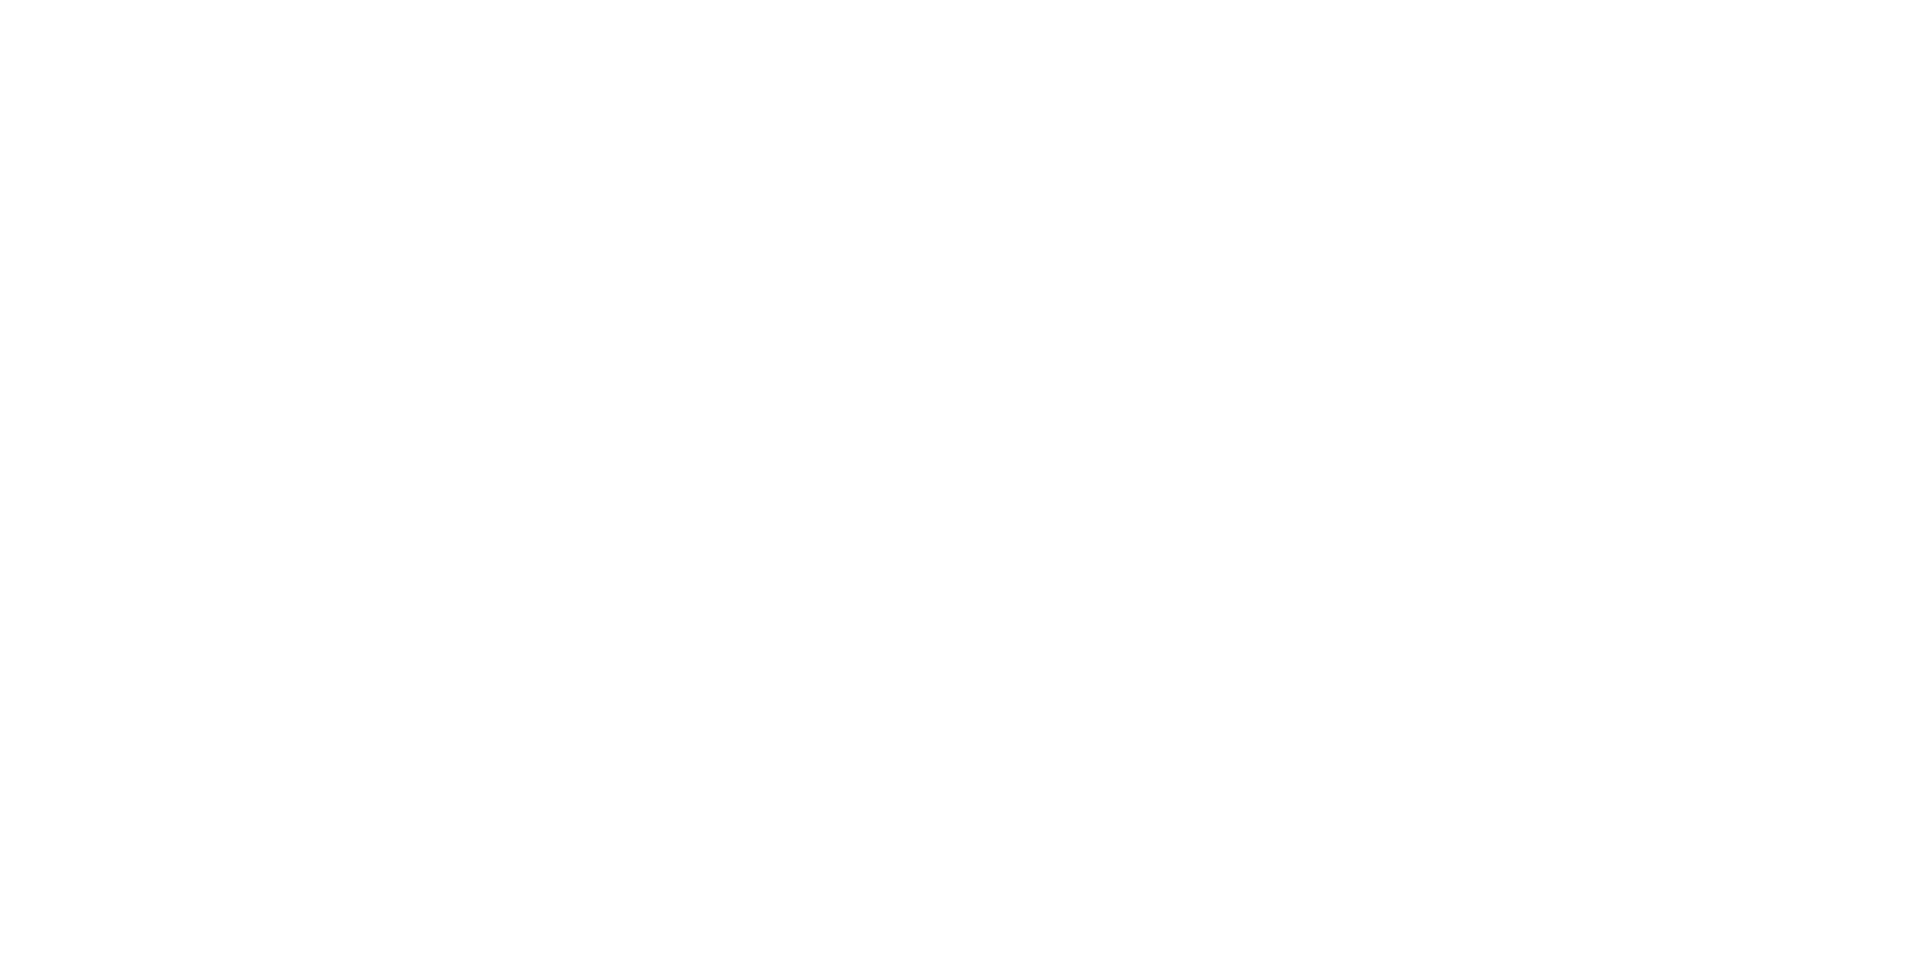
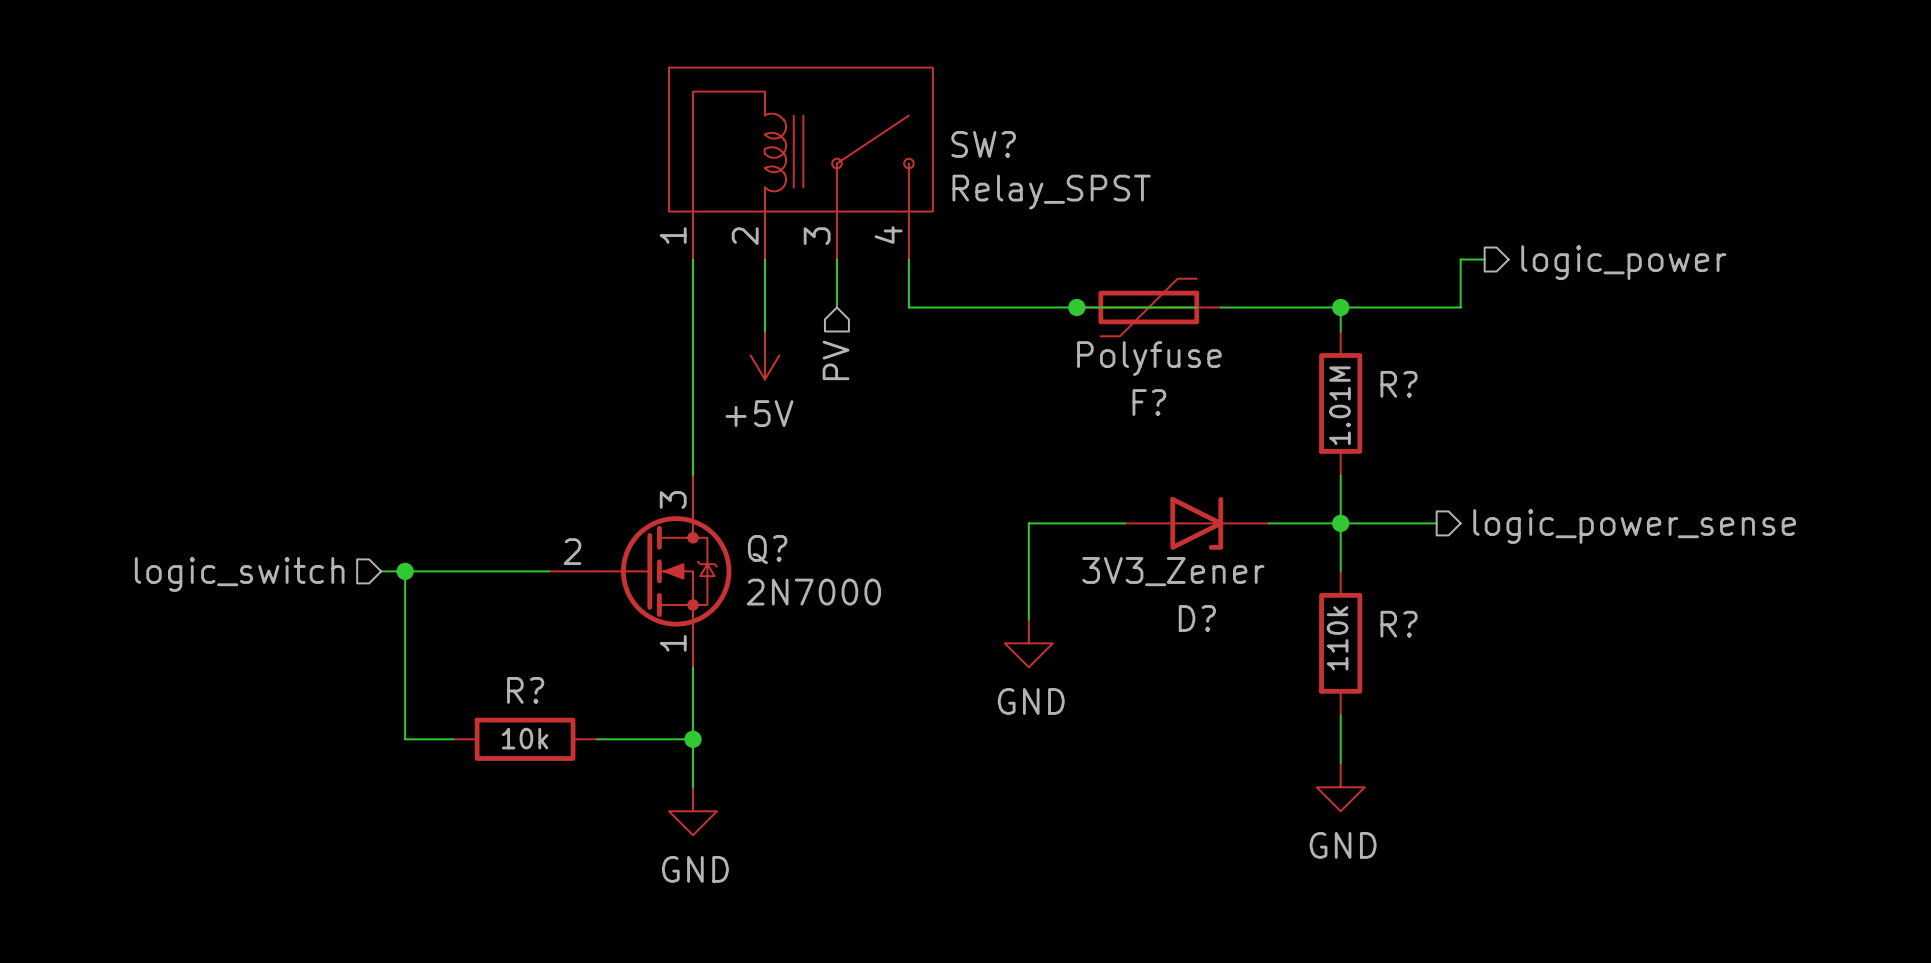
SW?: none -> Relay_SPST (800, 163)
wire: none -> (693, 259) (693, 475)
wire: none -> (764, 259) (764, 331)
wire: none -> (836, 259) (836, 307)
wire: none -> (908, 259) (908, 307) (1196, 307)
wire: none -> (1484, 259) (1460, 259) (1460, 307) (1220, 307)
hierarchical label: none -> logic_power (1623, 262)
junction: none -> (1076, 307)
F?: none -> Polyfuse (1148, 307)
wire: none -> (1340, 307) (1340, 331)
junction: none -> (1340, 307)
power symbol: none -> +5V (764, 355)
hierarchical label: none -> PV (836, 360)
R?: none -> 1.01M (1340, 403)
wire: none -> (1340, 475) (1340, 571)
wire: none -> (1124, 523) (1028, 523) (1028, 619)
D?: none -> 3V3_Zener (1196, 523)
wire: none -> (1268, 523) (1436, 523)
junction: none -> (1340, 523)
hierarchical label: none -> logic_power_sense (1634, 526)
wire: none -> (381, 571) (549, 571)
wire: none -> (405, 571) (405, 739) (453, 739)
junction: none -> (405, 571)
Q?: none -> 2N7000 (640, 571)
hierarchical label: none -> logic_switch (239, 574)
power symbol: none -> GND (1028, 643)
R?: none -> 110k (1340, 643)
wire: none -> (693, 667) (693, 787)
wire: none -> (1340, 715) (1340, 763)
R?: none -> 10k (525, 739)
wire: none -> (597, 739) (693, 739)
junction: none -> (693, 739)
power symbol: none -> GND (1340, 787)
power symbol: none -> GND (693, 811)

